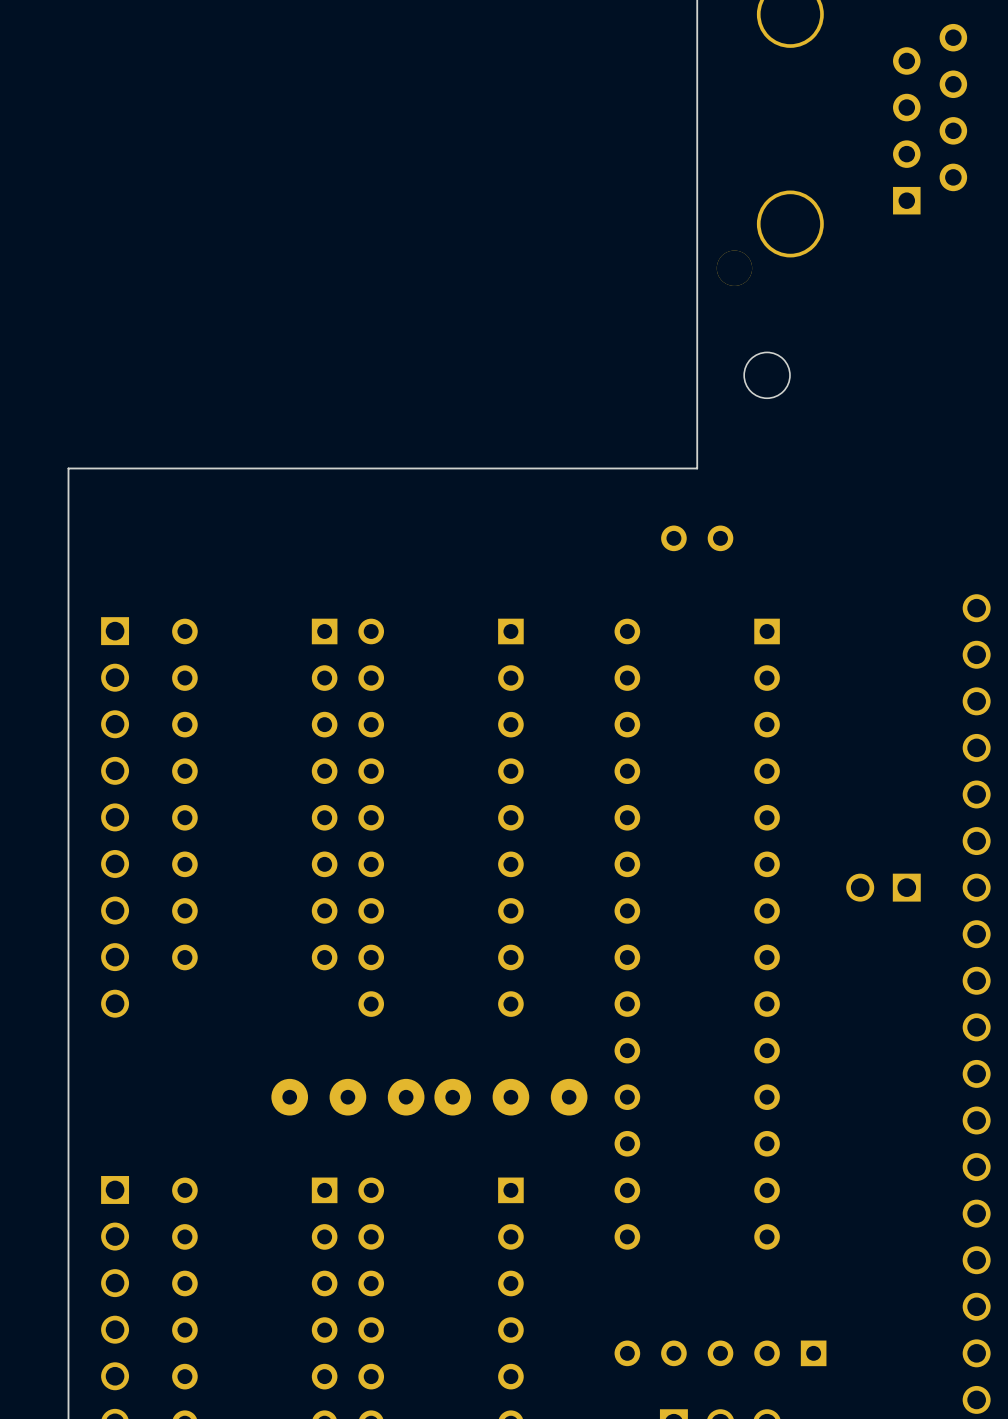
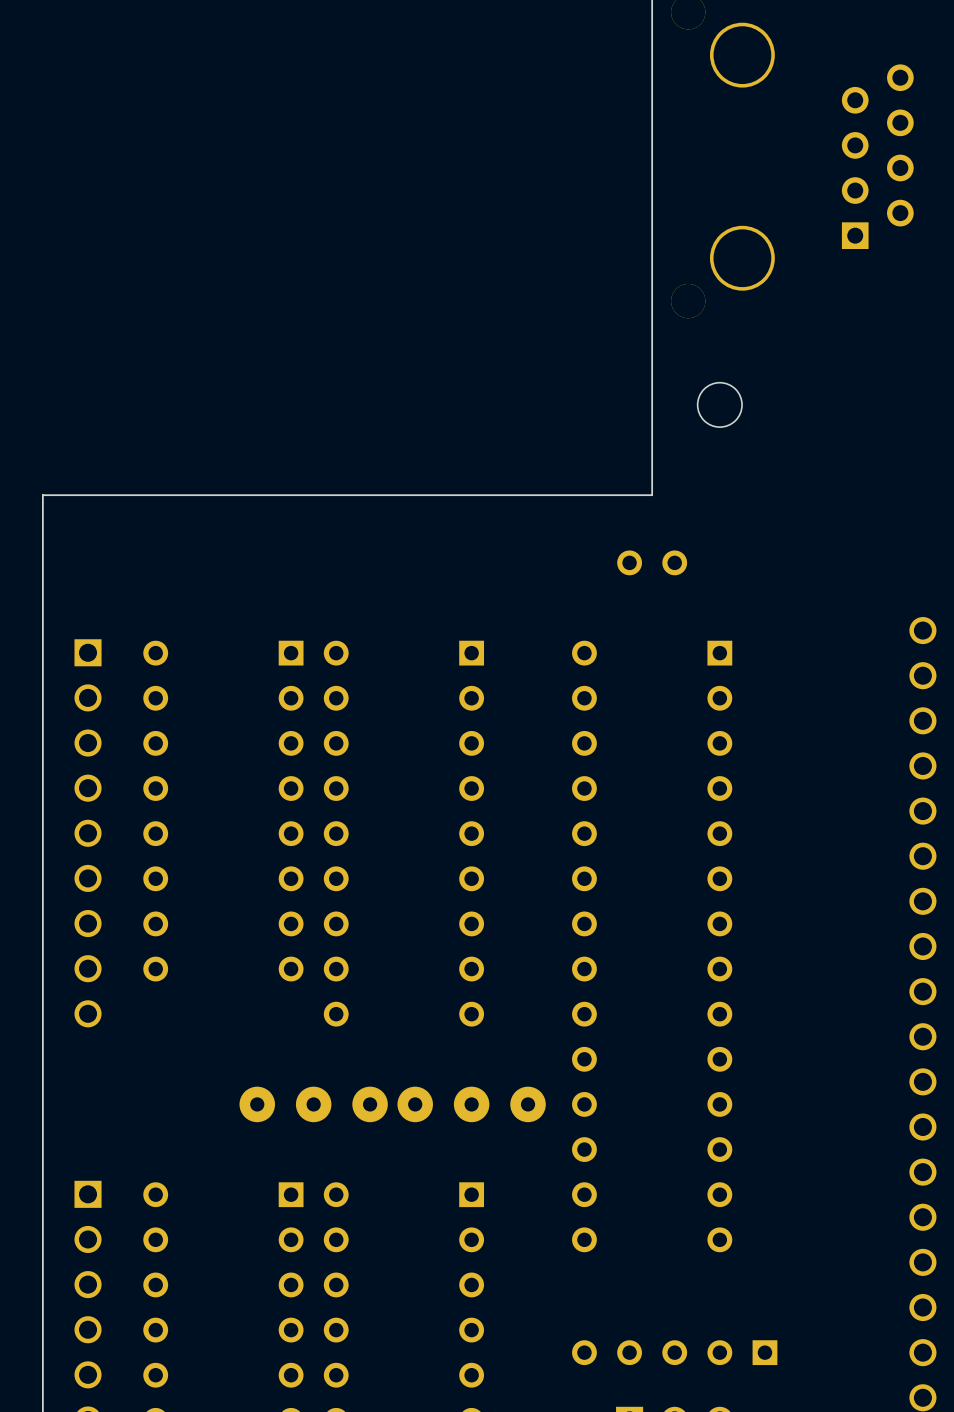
part: (883, 887) -> none

